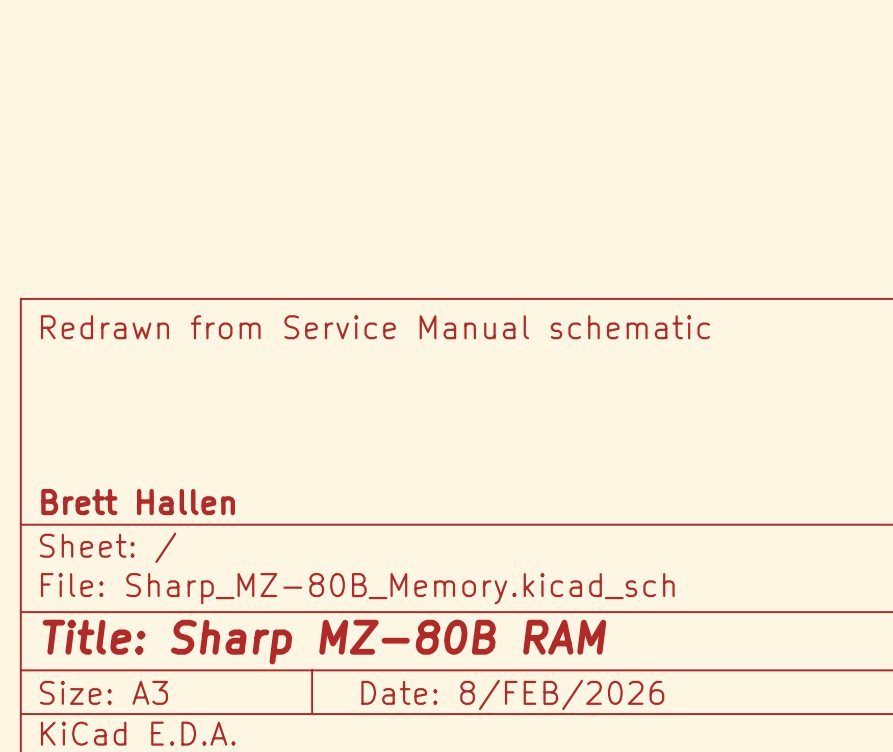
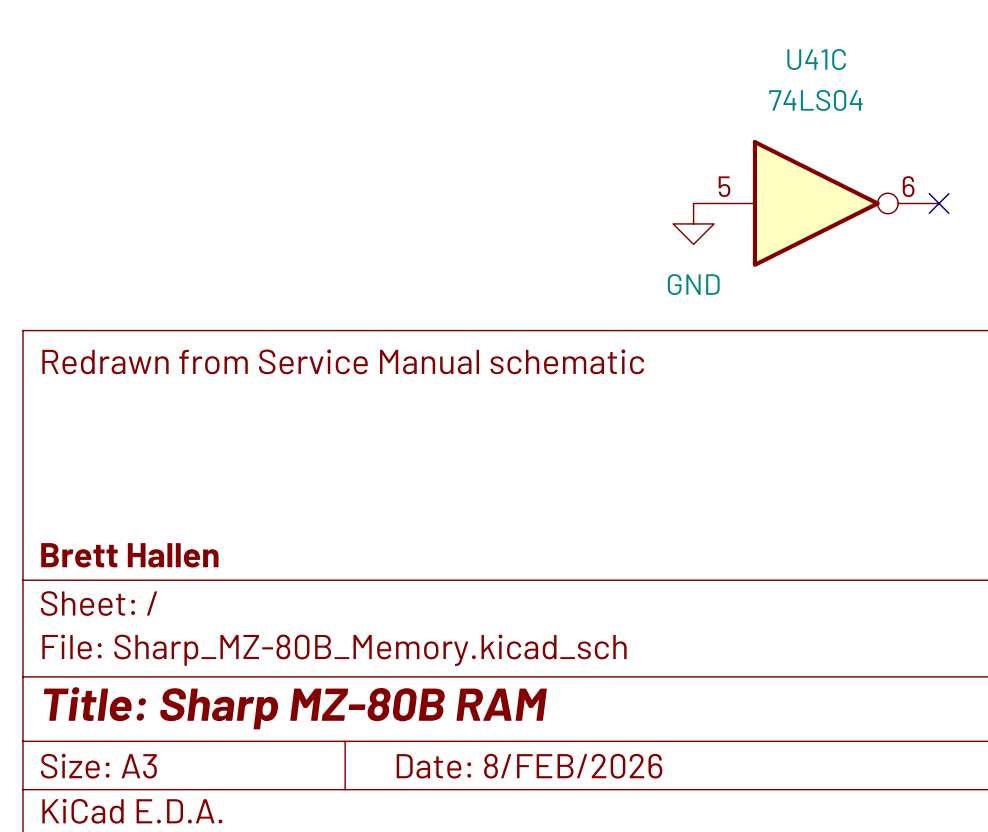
U41C: none -> 74LS04 (816, 203)
no-connect mark: none -> (939, 203)
power symbol: none -> GND (693, 223)

